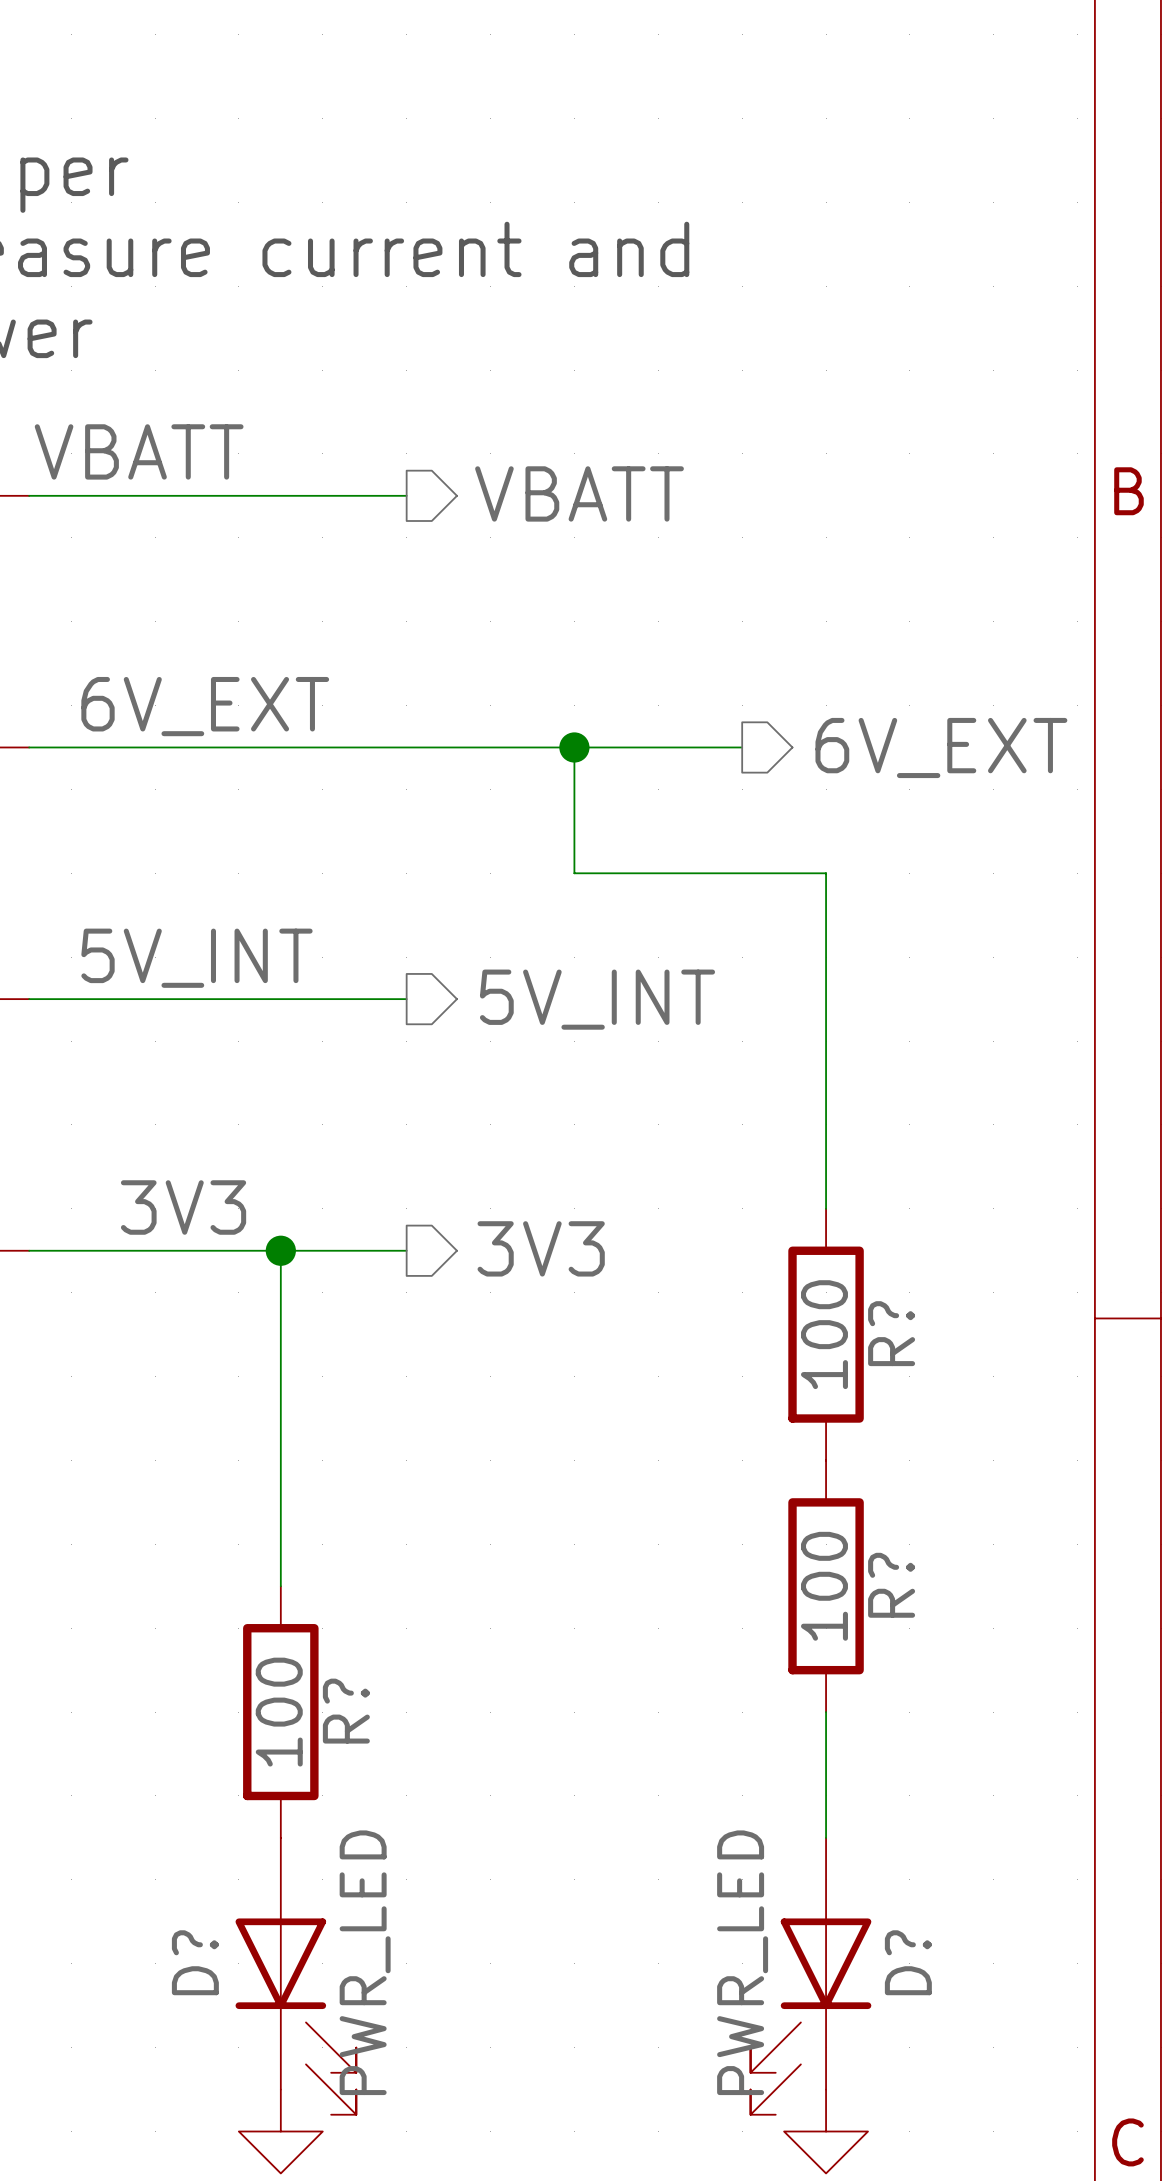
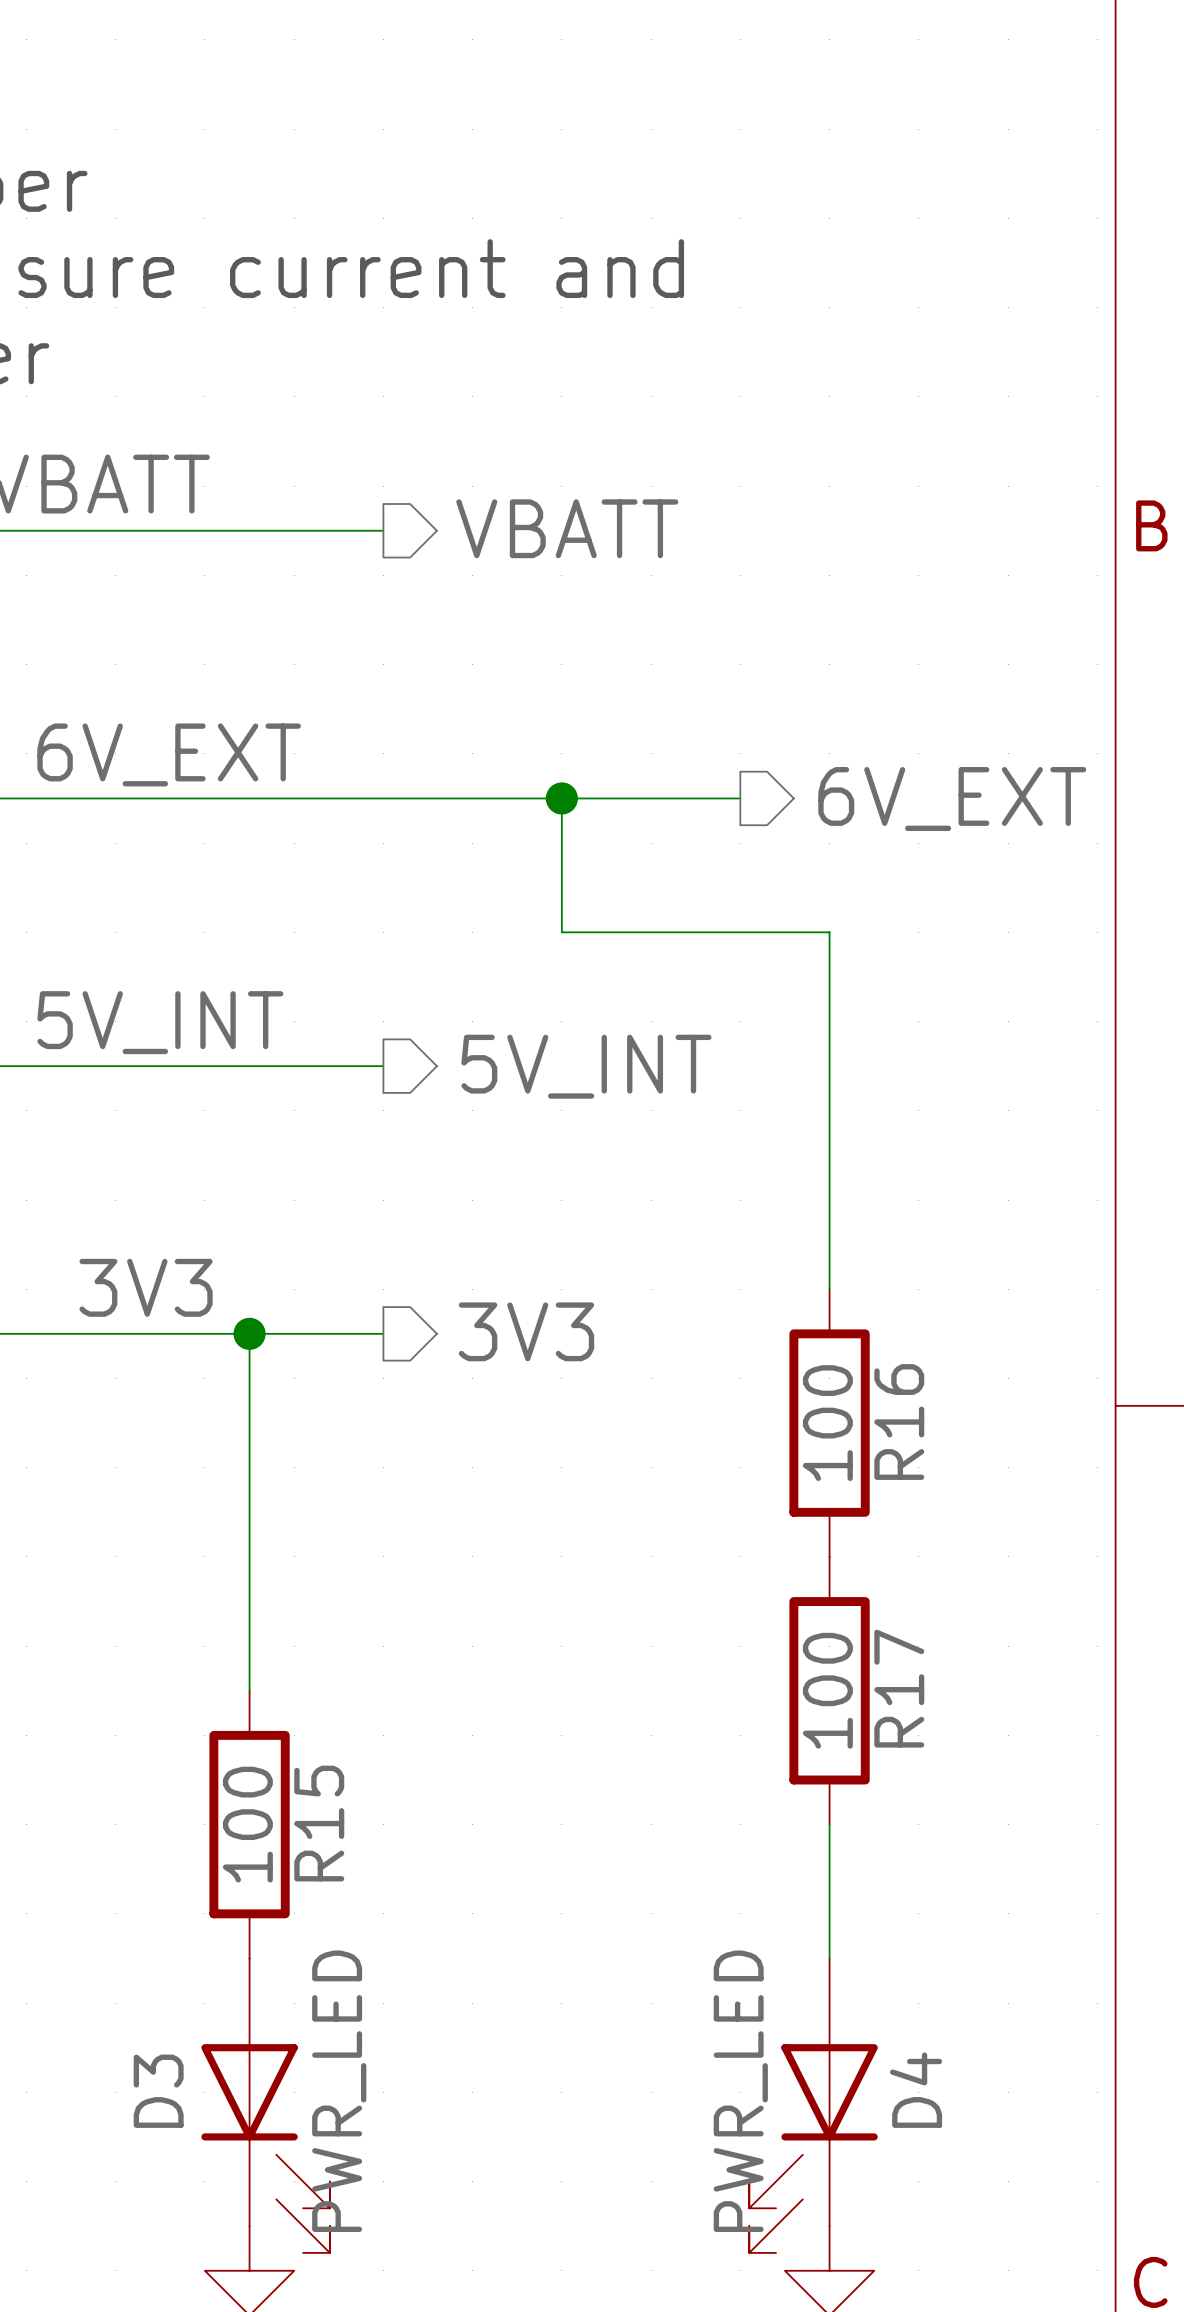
R? name: R? (891, 1333) -> R16 (899, 1422)
R? name: R? (891, 1585) -> R17 (899, 1688)
R? name: R? (346, 1711) -> R15 (319, 1823)
D? name: D? (195, 1962) -> D3 (158, 2091)
D? name: D? (908, 1962) -> D4 (916, 2090)

